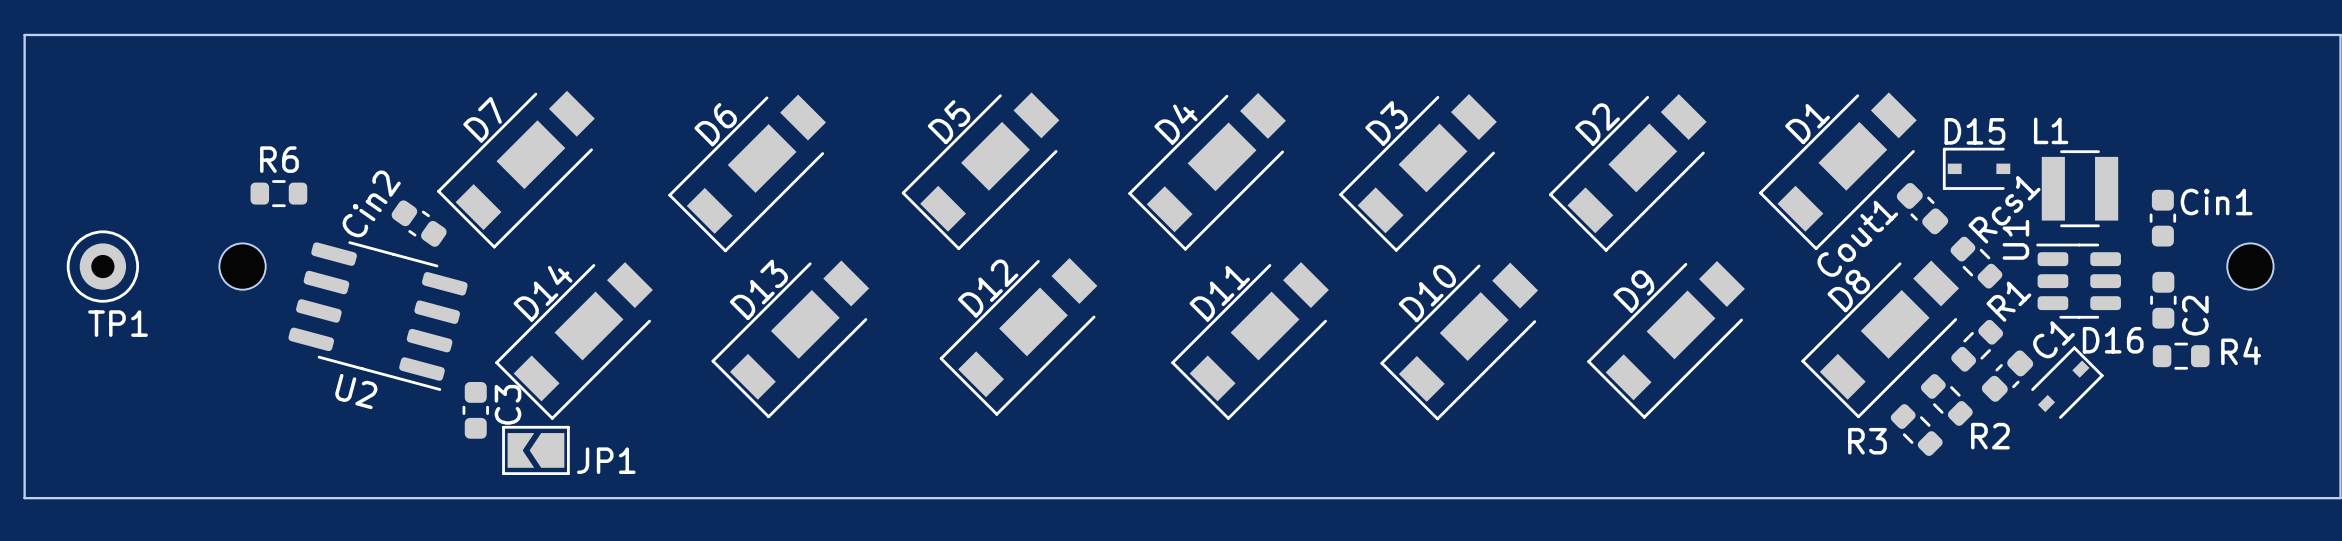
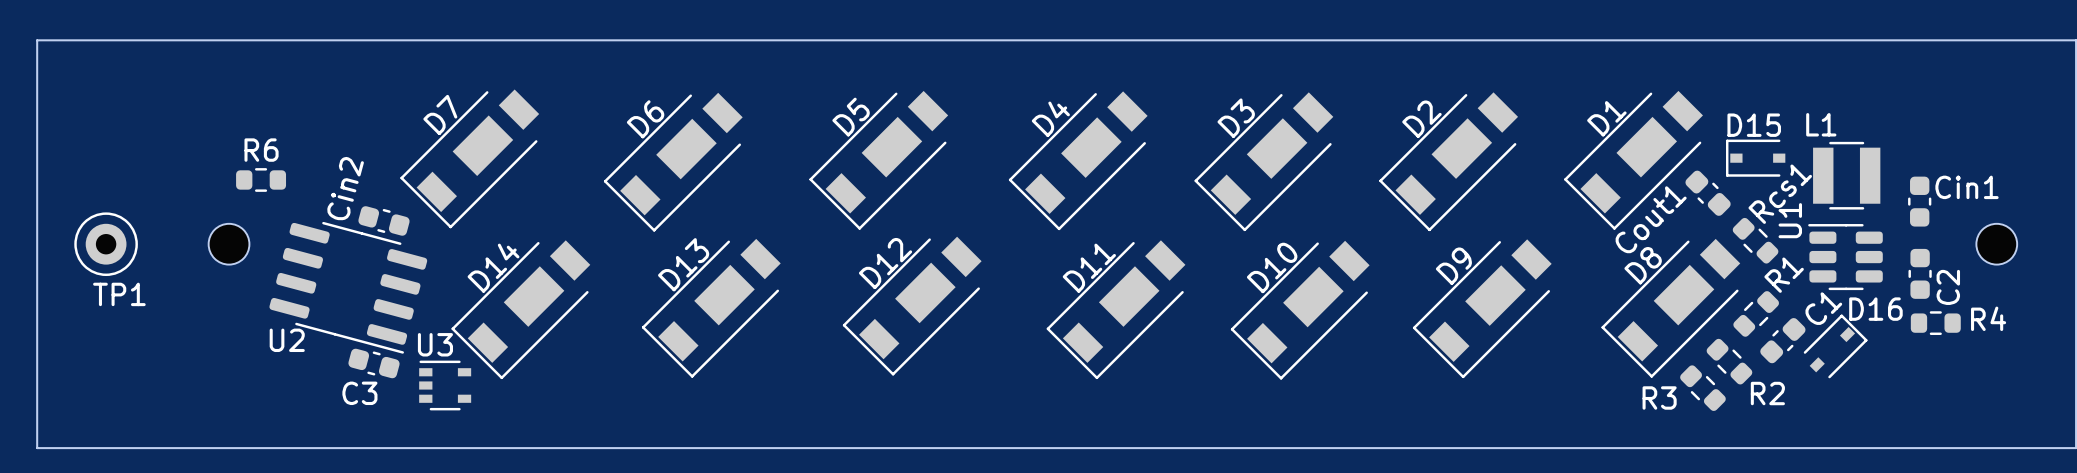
Cin2 rotation: 0° (419, 223) -> 20° counterclockwise (383, 220)
U2 name rotation: 0° (356, 391) -> 15° counterclockwise (287, 340)
C3 name position: C3 (508, 404) -> C3 (359, 393)
C3 rotation: 0° (475, 410) -> 75° counterclockwise (374, 363)
C3 position: (475, 410) -> (374, 363)
U3: none -> (445, 385)
JP1: (535, 450) -> none

